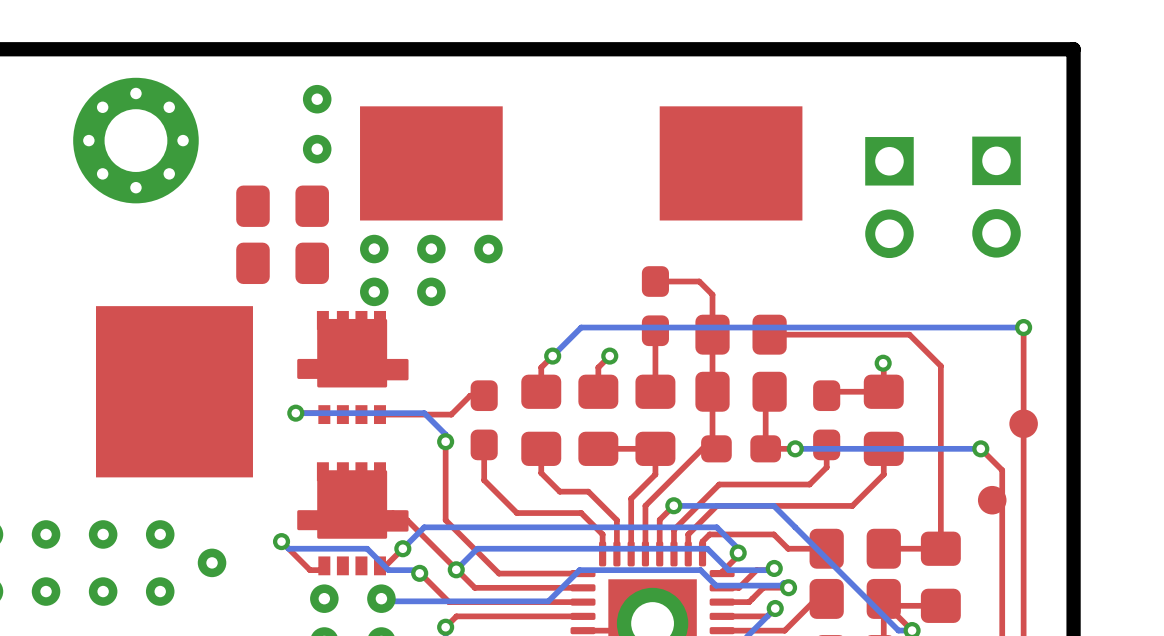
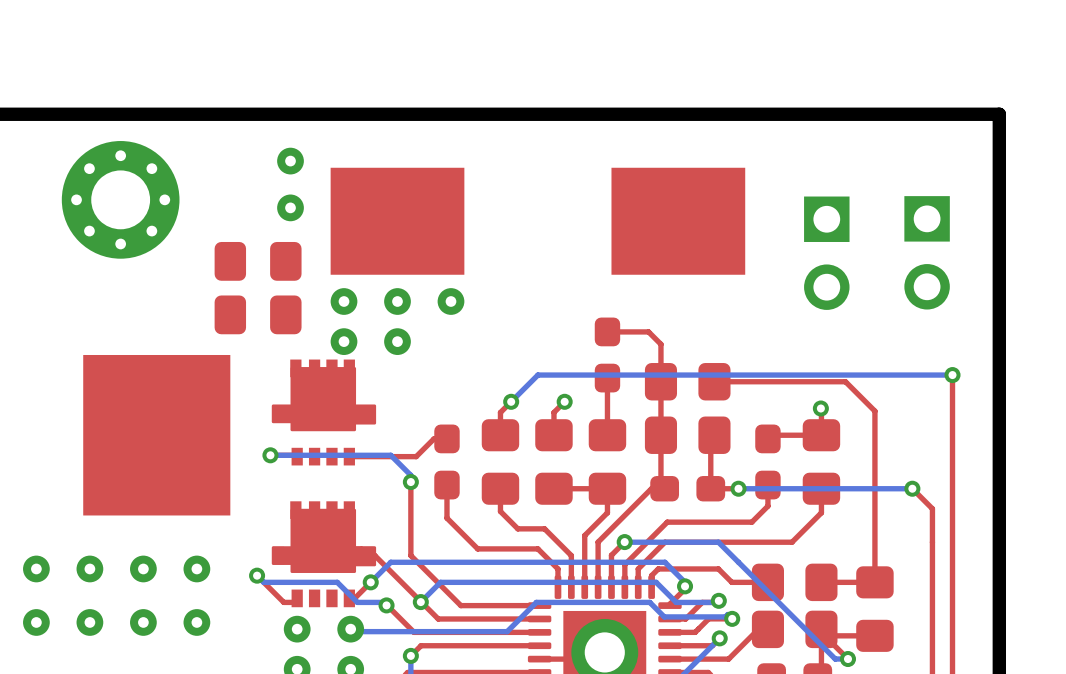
part: (1023, 423) -> none
part: (992, 500) -> none
via: none -> (196, 568)
via: (212, 562) -> none
via: none -> (196, 622)

